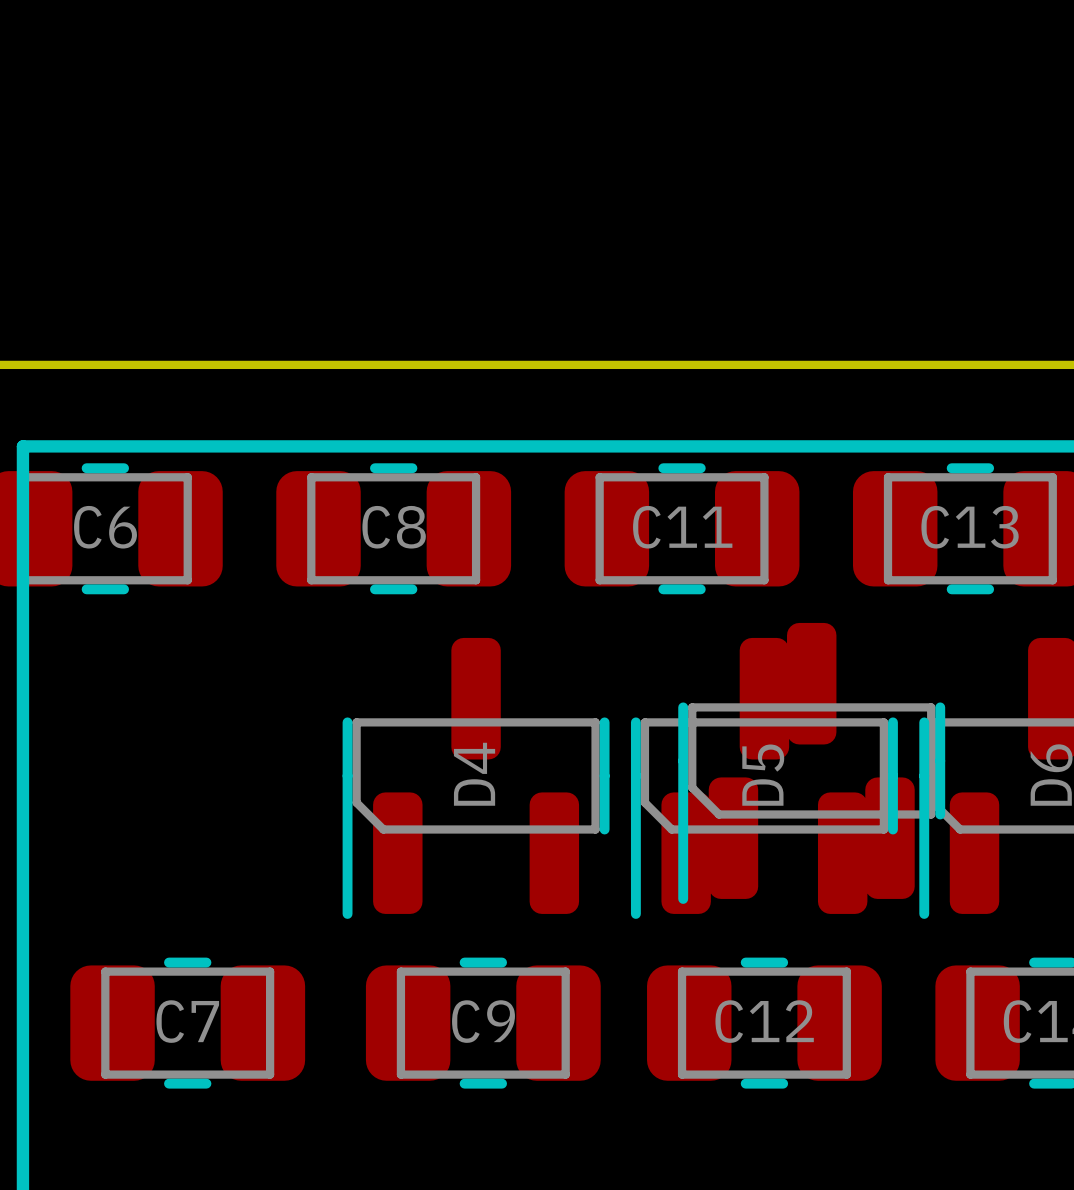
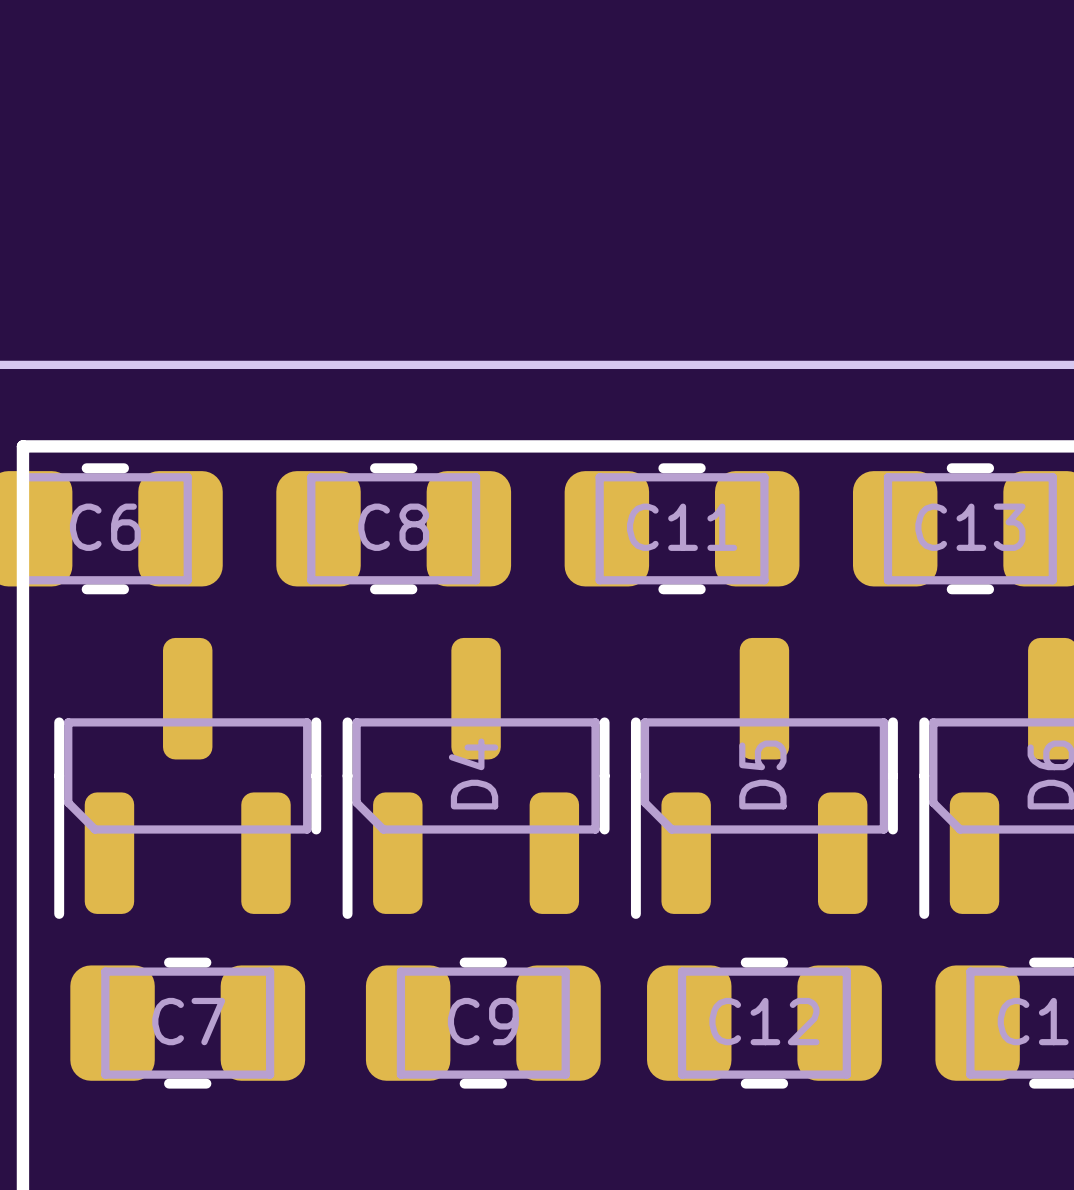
part position: (811, 763) -> (187, 778)

